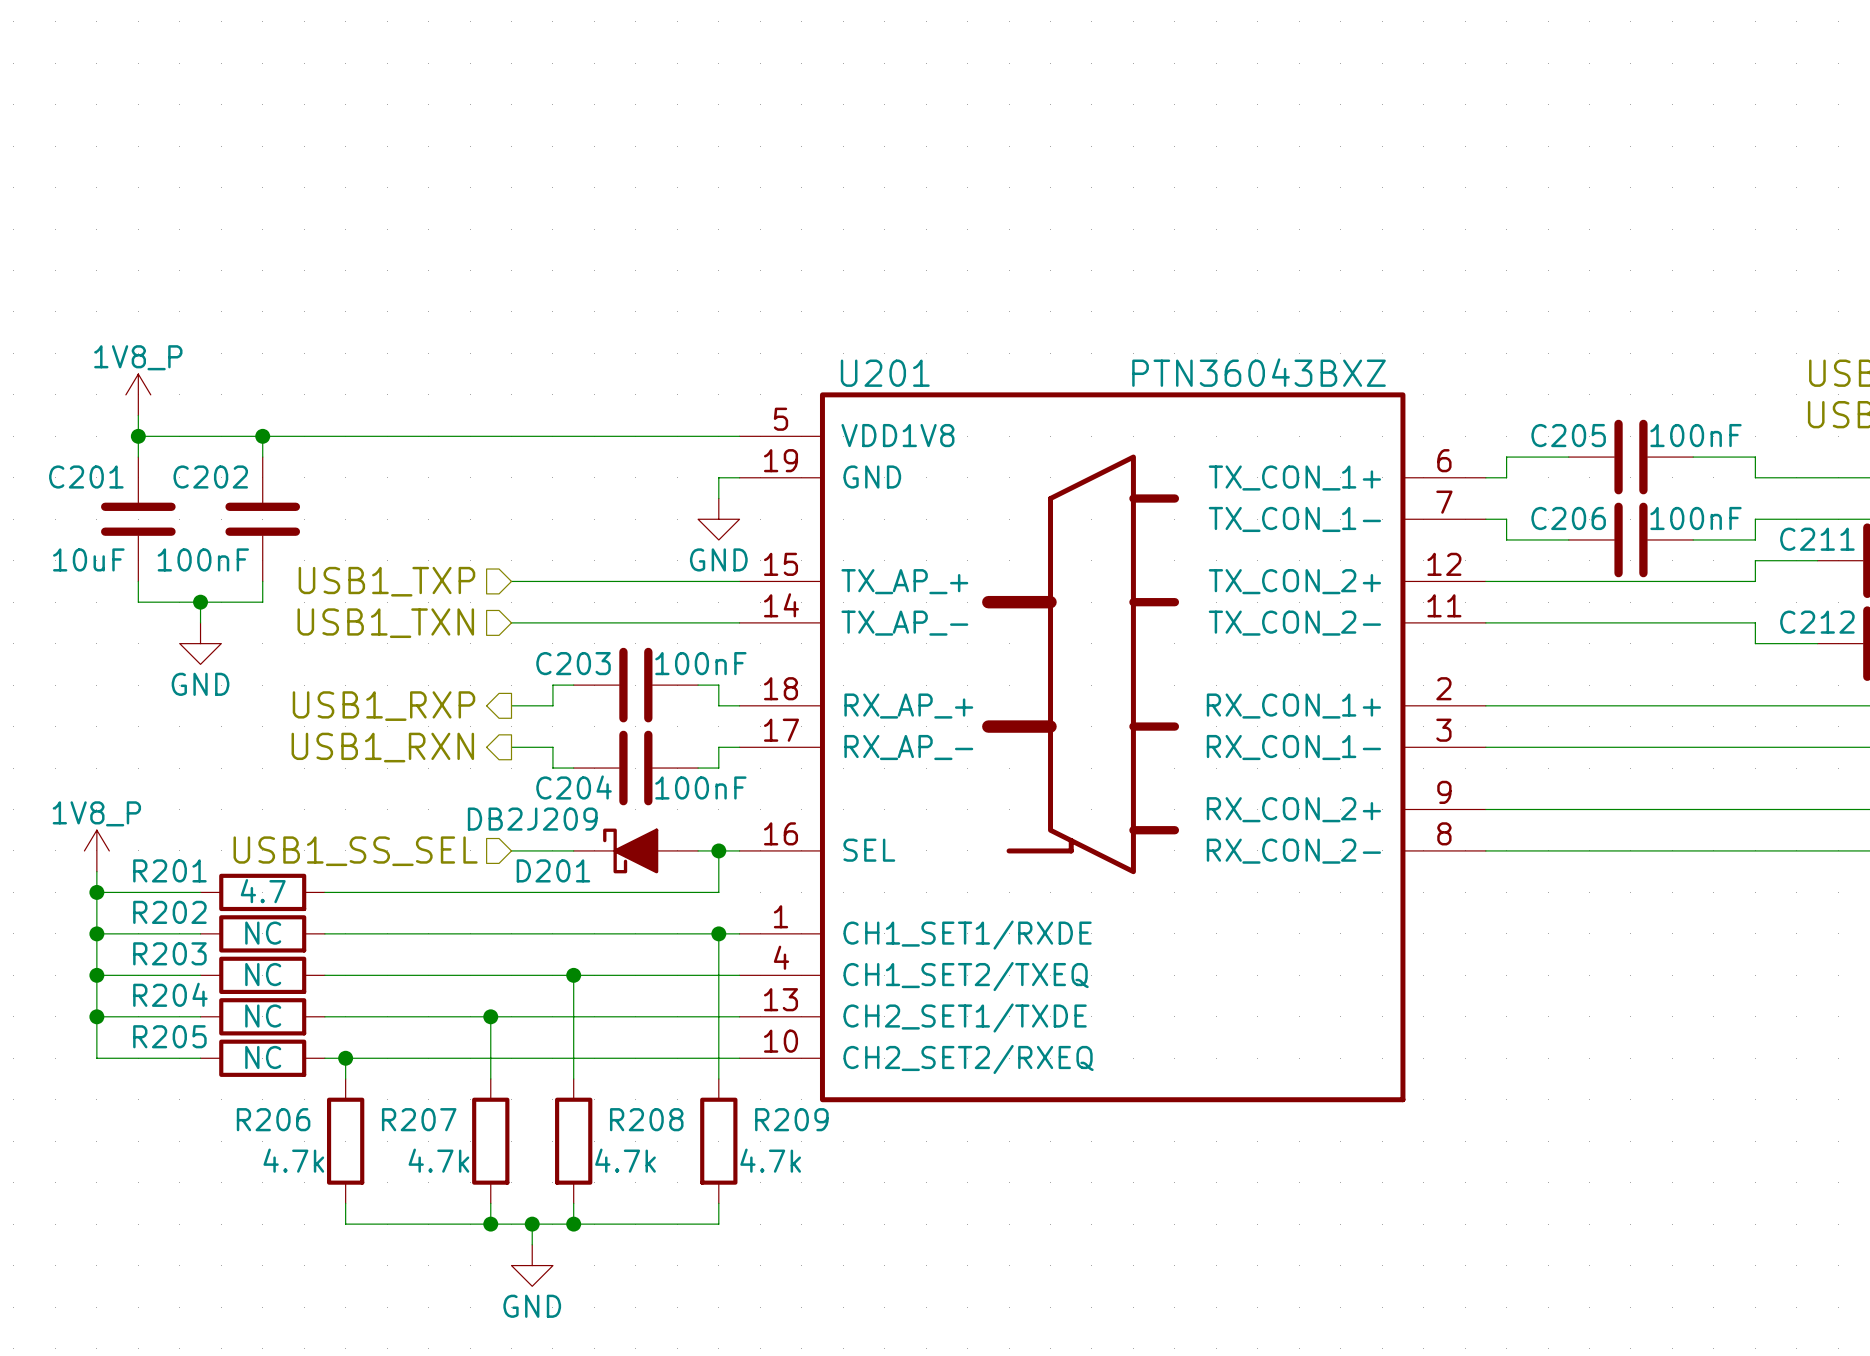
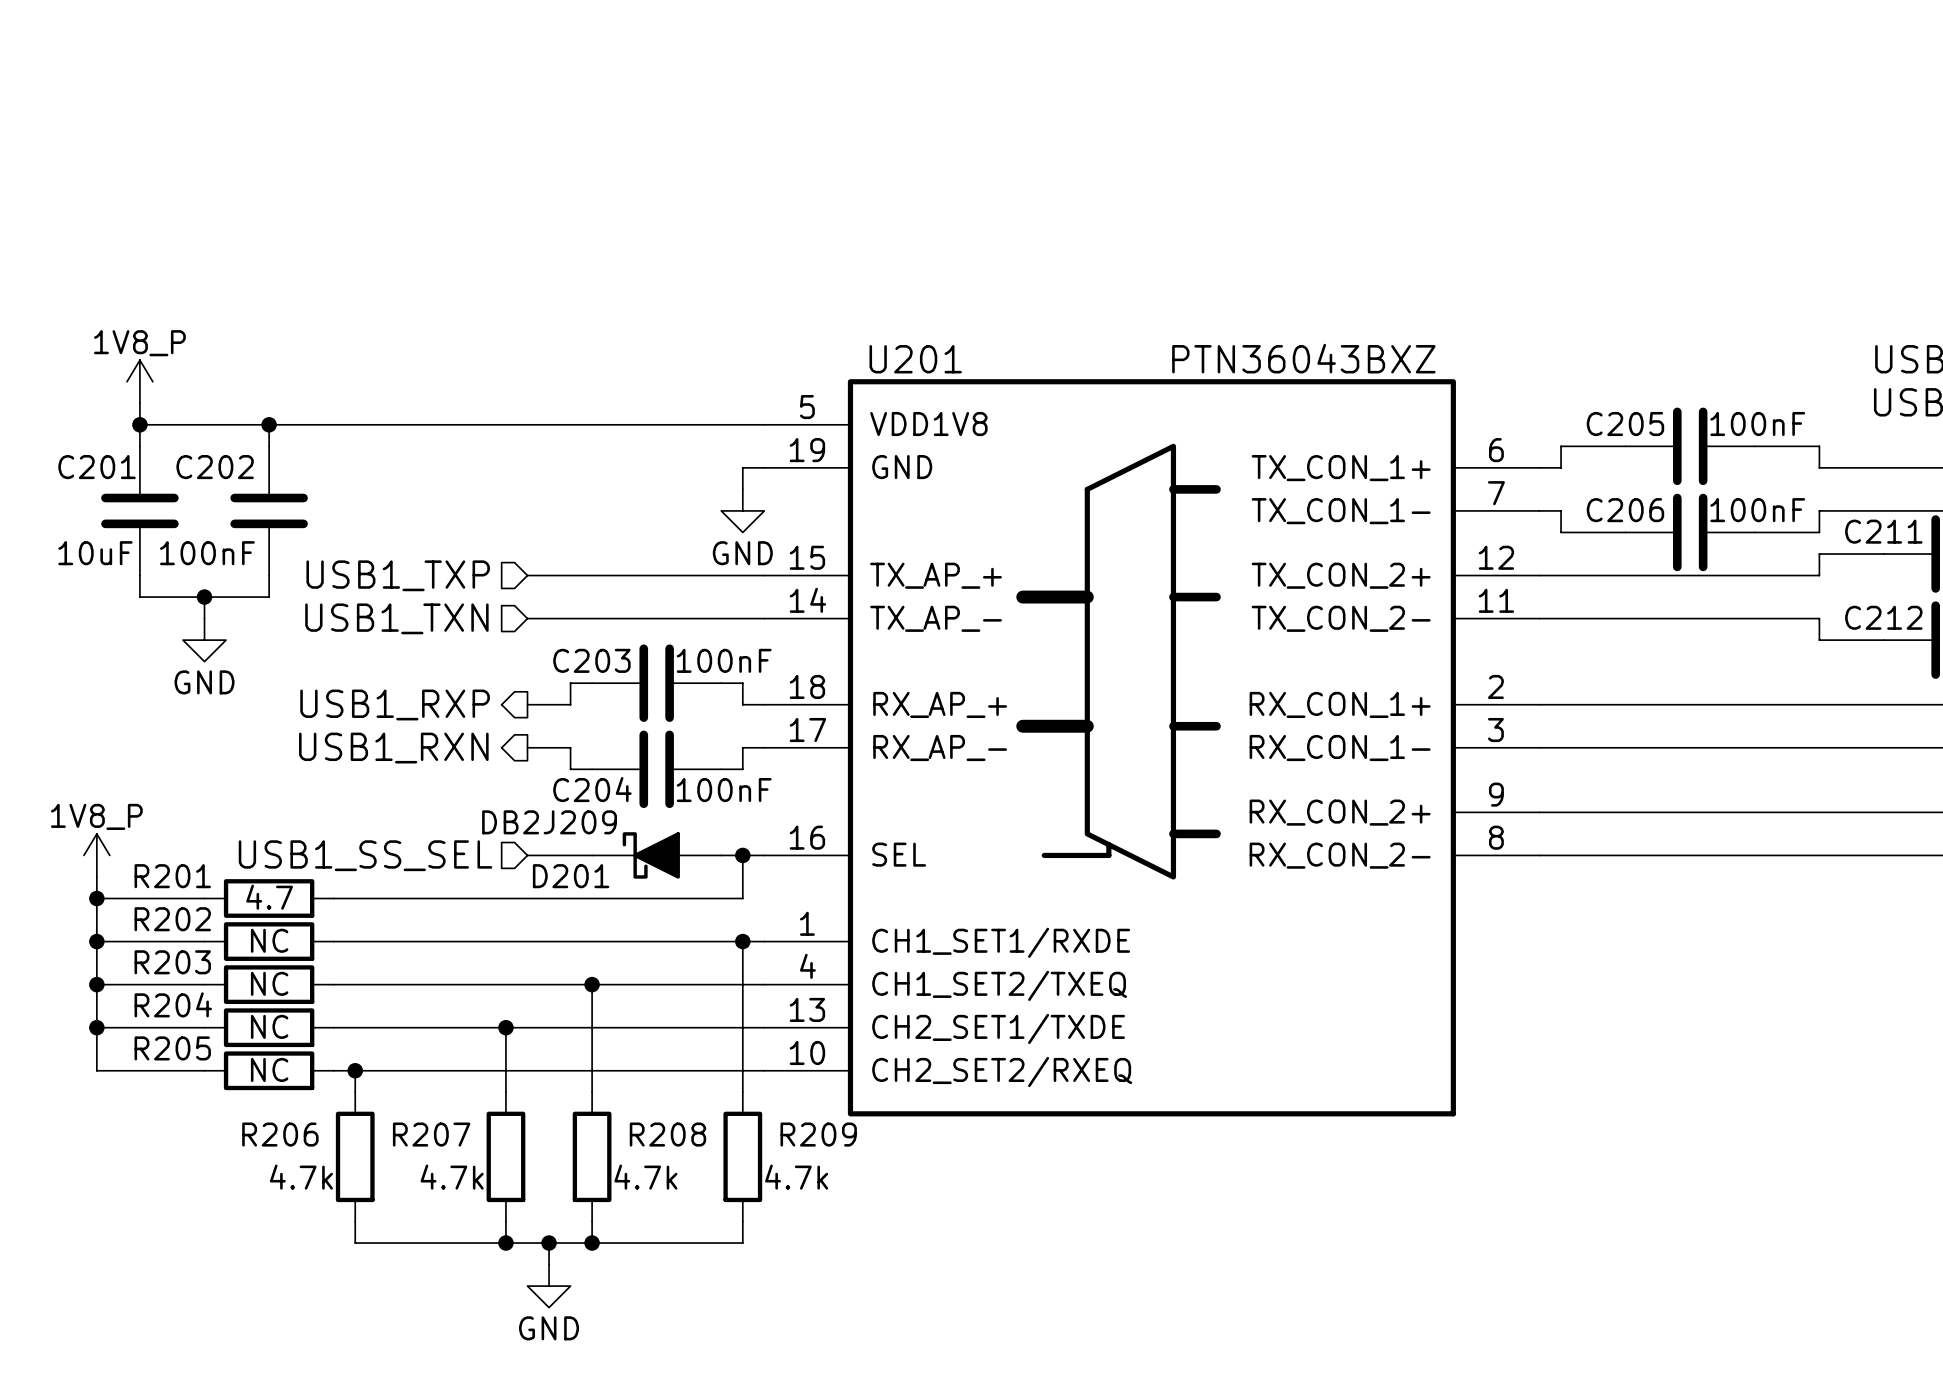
C201 name position: C201 (86, 477) -> C201 (97, 467)
C201 value position: 10uF (88, 559) -> 10uF (95, 553)

